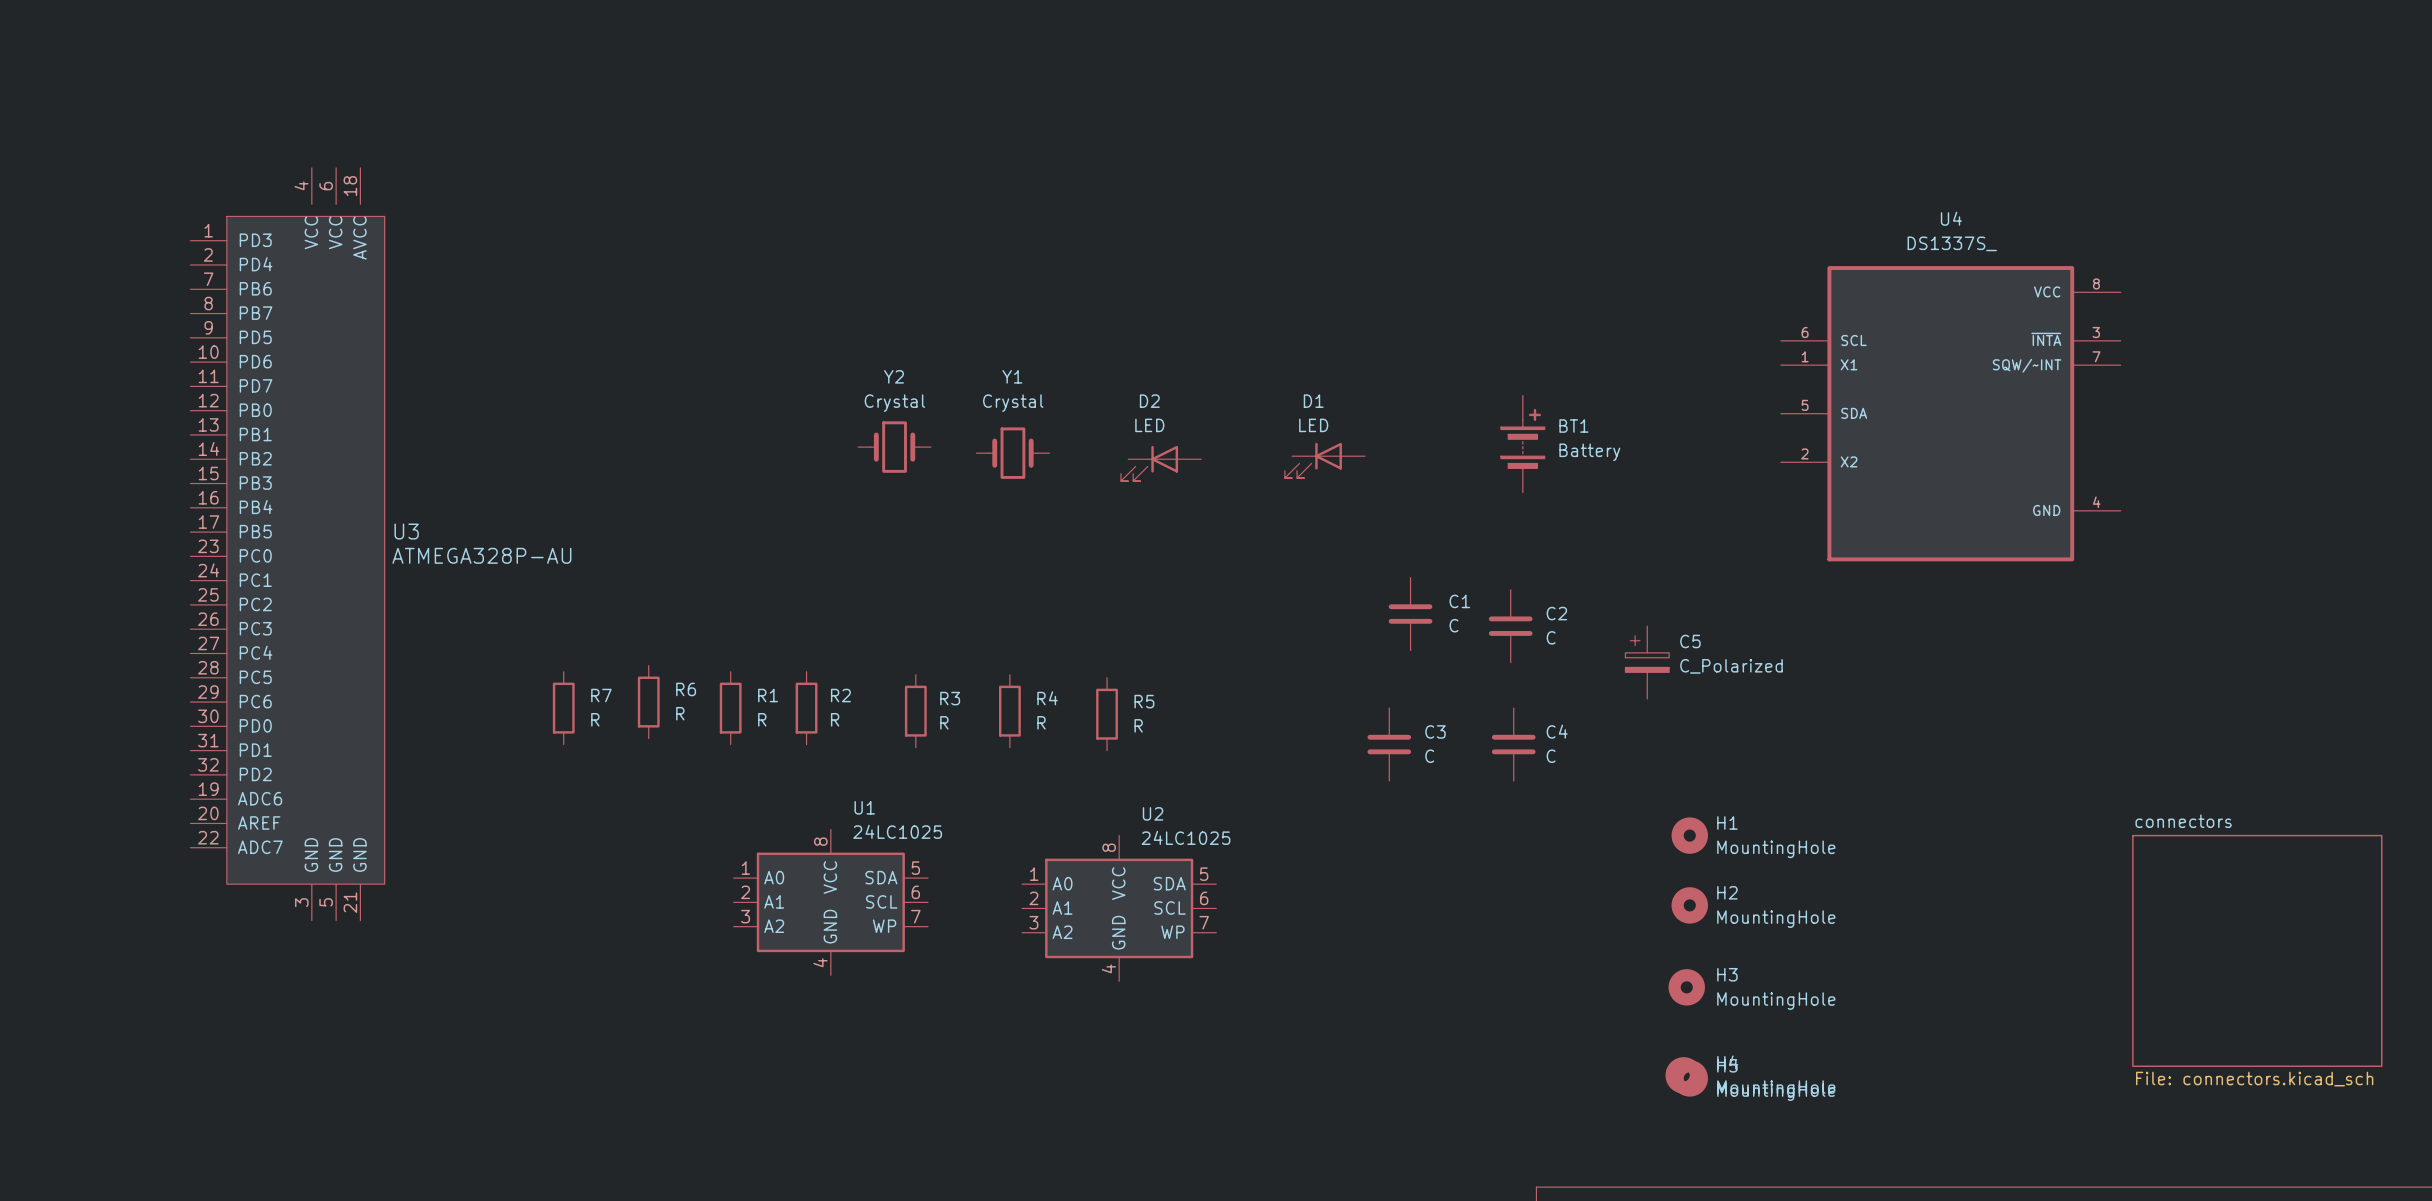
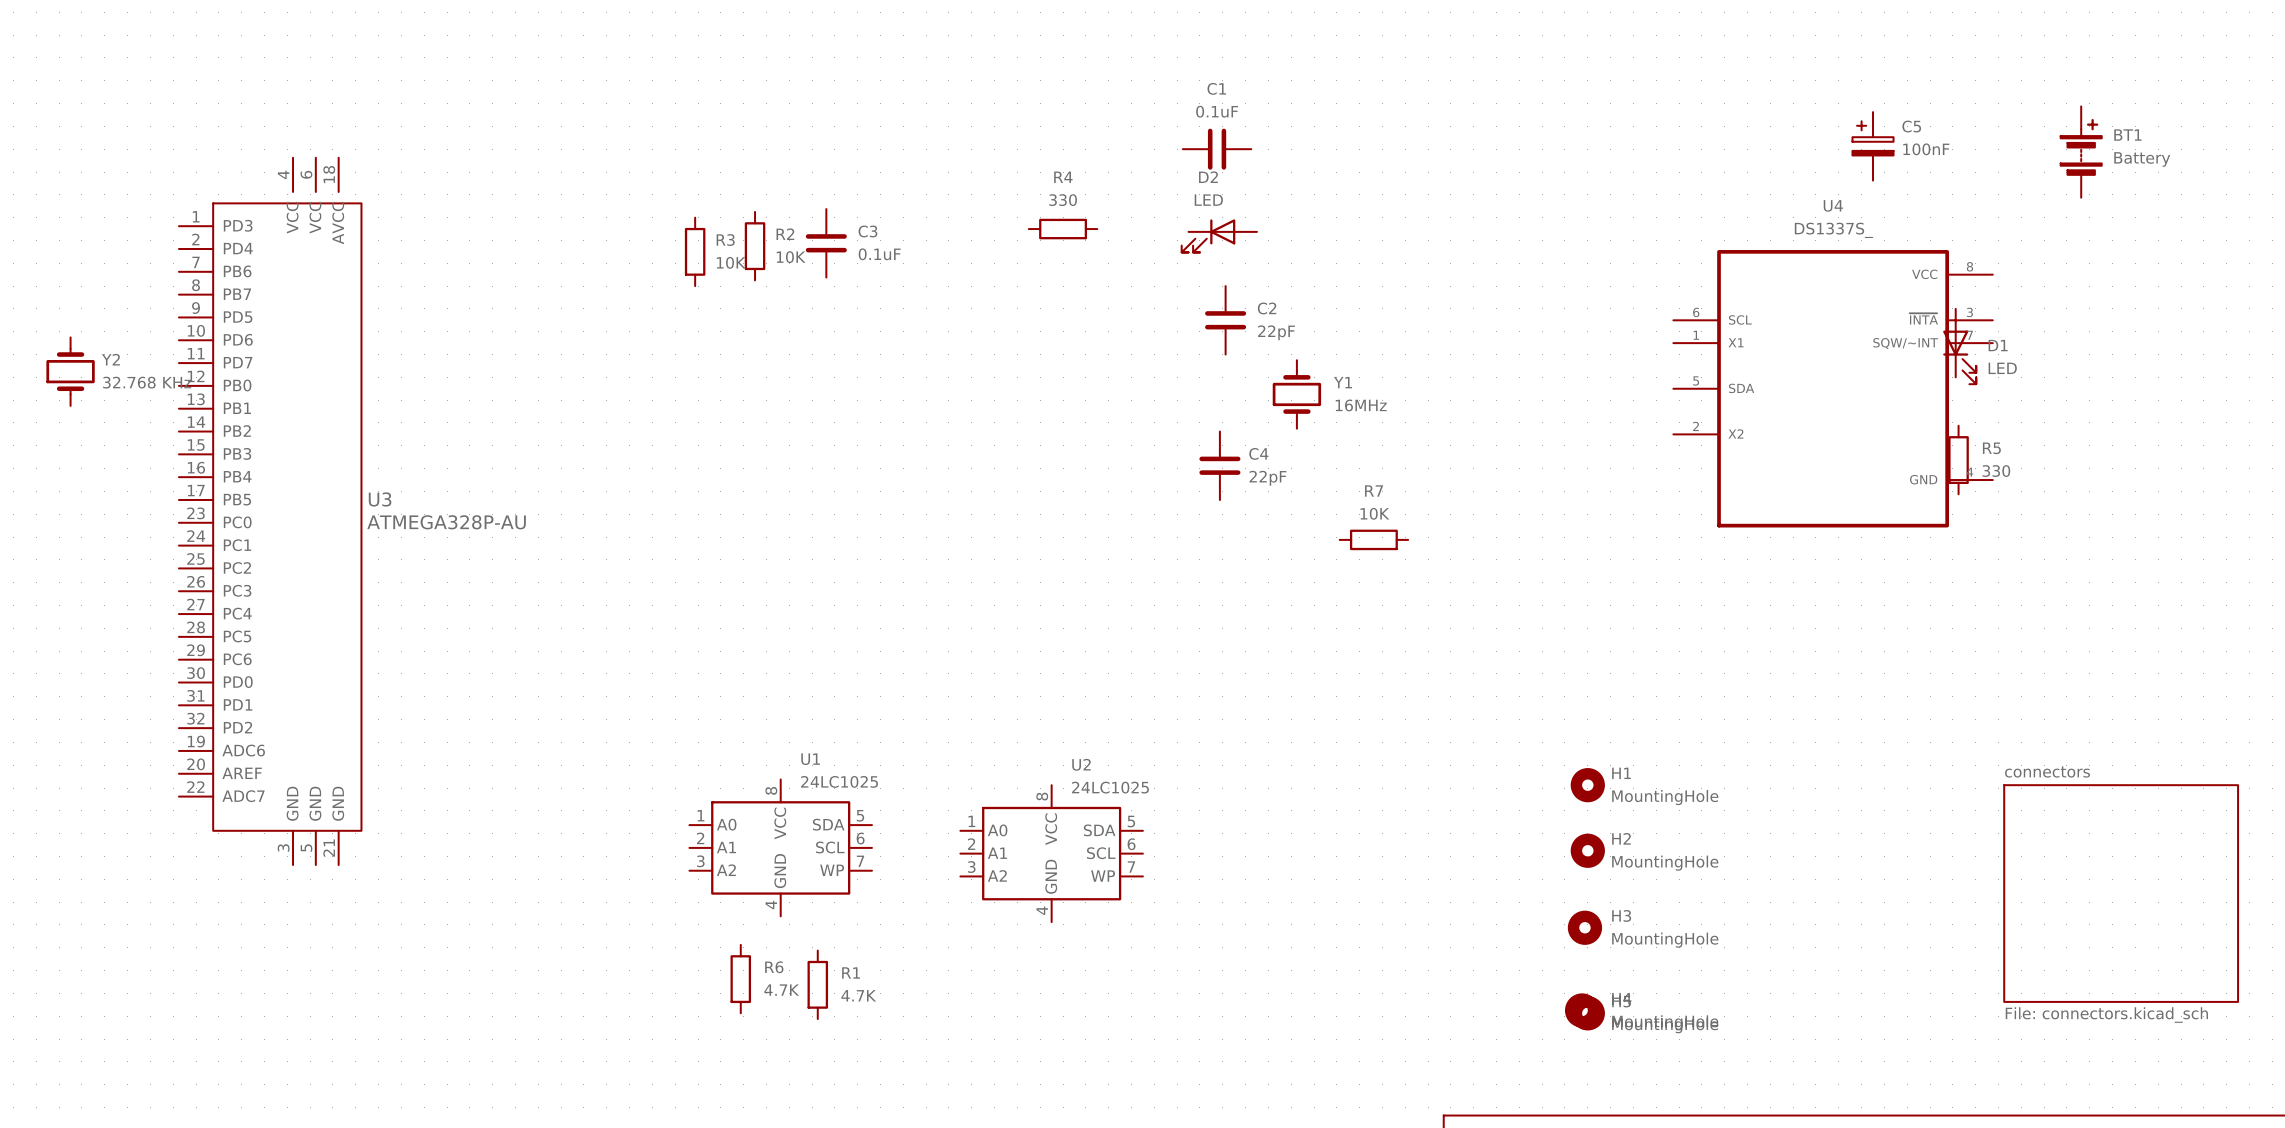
Y2 name position: Y2 (893, 376) -> Y2 (110, 359)
Y1 name position: Y1 (1012, 376) -> Y1 (1343, 382)
D1 name position: D1 (1313, 401) -> D1 (1998, 345)
Y2 value: Crystal (894, 403) -> 32.768 KHz (147, 382)
Y1 value: Crystal (1013, 403) -> 16MHz (1361, 405)
D1 value position: LED (1313, 425) -> LED (2002, 368)
Y1 symbol: [976, 427, 1050, 479] -> [1272, 360, 1322, 429]
D1 symbol: [1284, 442, 1366, 479] -> [1943, 308, 1977, 385]
BT1 position: (1522, 444) -> (2081, 152)
D2 symbol: [1120, 445, 1202, 482] -> [1181, 219, 1257, 253]
Y2 rotation: 0° (894, 447) -> 90° clockwise (70, 371)
Y2 position: (894, 447) -> (70, 371)
C1 name position: C1 (1459, 601) -> C1 (1216, 88)
C1 rotation: 0° (1410, 614) -> 90° clockwise (1217, 149)
C1 position: (1410, 614) -> (1217, 149)
C1 value: C (1453, 625) -> 0.1uF (1217, 111)
C2 position: (1510, 626) -> (1225, 320)
C5 symbol: [1625, 626, 1670, 700] -> [1852, 112, 1894, 181]
C2 value: C (1551, 637) -> 22pF (1276, 332)
C5 value: C_Polarized (1731, 666) -> 100nF (1926, 149)
R1 symbol: [719, 671, 742, 745] -> [807, 950, 829, 1020]
R7 name position: R7 (601, 695) -> R7 (1374, 490)
R4 name position: R4 (1047, 698) -> R4 (1063, 177)
R6 position: (648, 702) -> (740, 979)
R7 rotation: 0° (563, 708) -> 90° clockwise (1373, 539)
R7 position: (563, 708) -> (1373, 539)
R2 position: (806, 708) -> (755, 246)
R3 position: (915, 711) -> (695, 251)
R4 rotation: 0° (1009, 711) -> 90° clockwise (1063, 229)
R4 position: (1009, 711) -> (1063, 229)
R6 value: R (680, 713) -> 4.7K (781, 990)
R5 position: (1107, 714) -> (1958, 460)
R7 value: R (595, 719) -> 10K (1374, 513)
R1 value: R (762, 719) -> 4.7K (858, 995)
R2 value: R (835, 719) -> 10K (791, 257)
R3 value: R (944, 722) -> 10K (731, 262)
R4 value: R (1041, 722) -> 330 (1063, 200)
R5 value: R (1138, 725) -> 330 (1996, 471)
C3 position: (1389, 744) -> (826, 243)
C4 position: (1513, 744) -> (1219, 465)
C3 value: C (1429, 756) -> 0.1uF (879, 254)
C4 value: C (1551, 756) -> 22pF (1267, 478)

